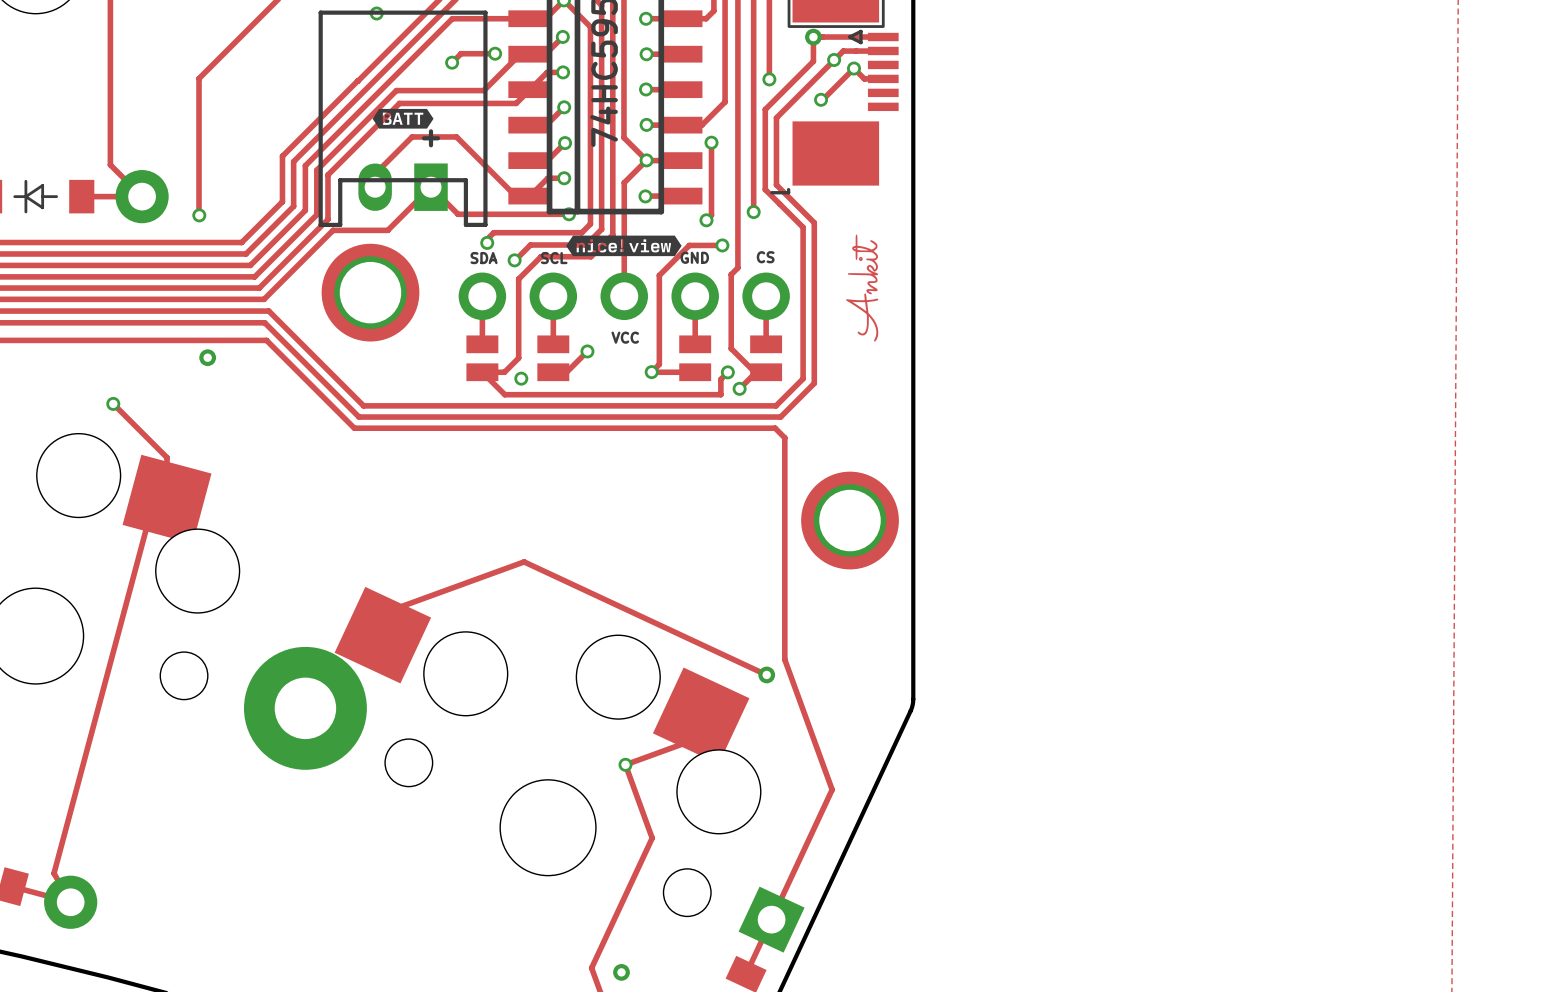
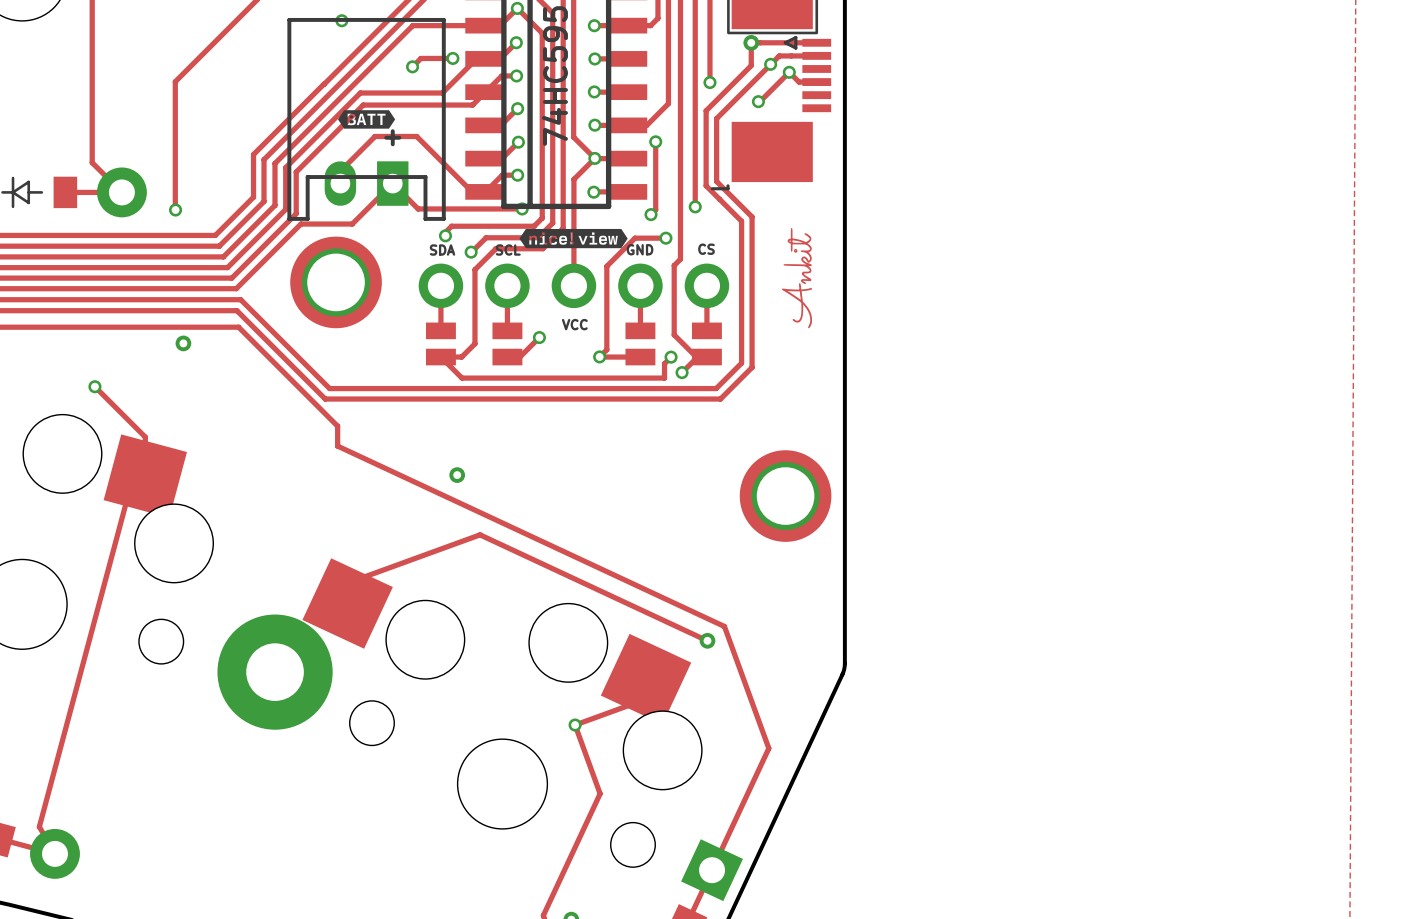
via: (521, 378) -> none
track: (354, 428) (775, 428) (784, 437) (784, 659) -> (320, 409) (337, 426) (337, 446) (724, 626)
via: none -> (457, 475)

